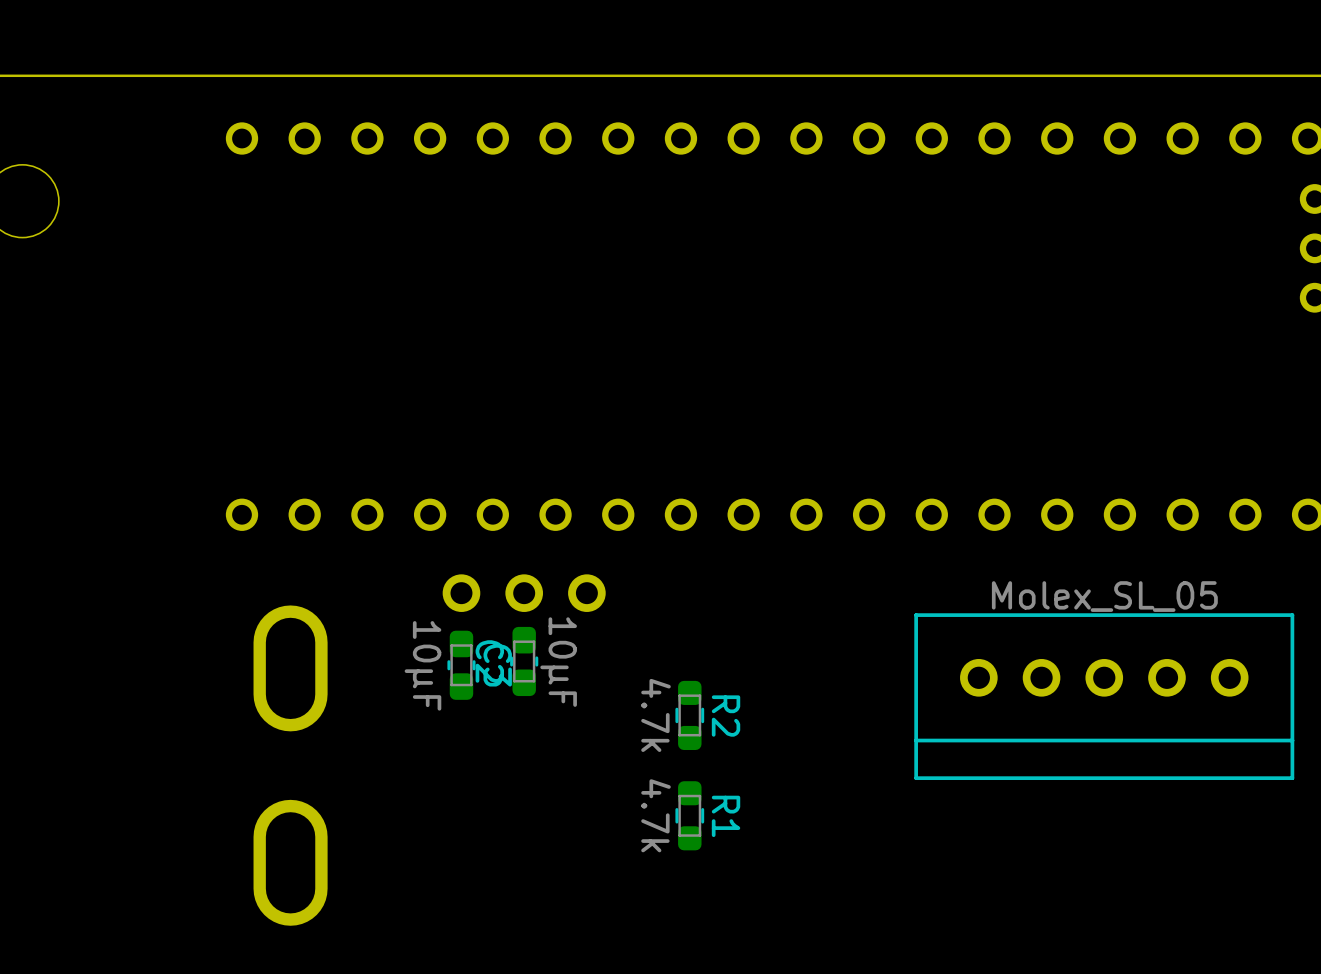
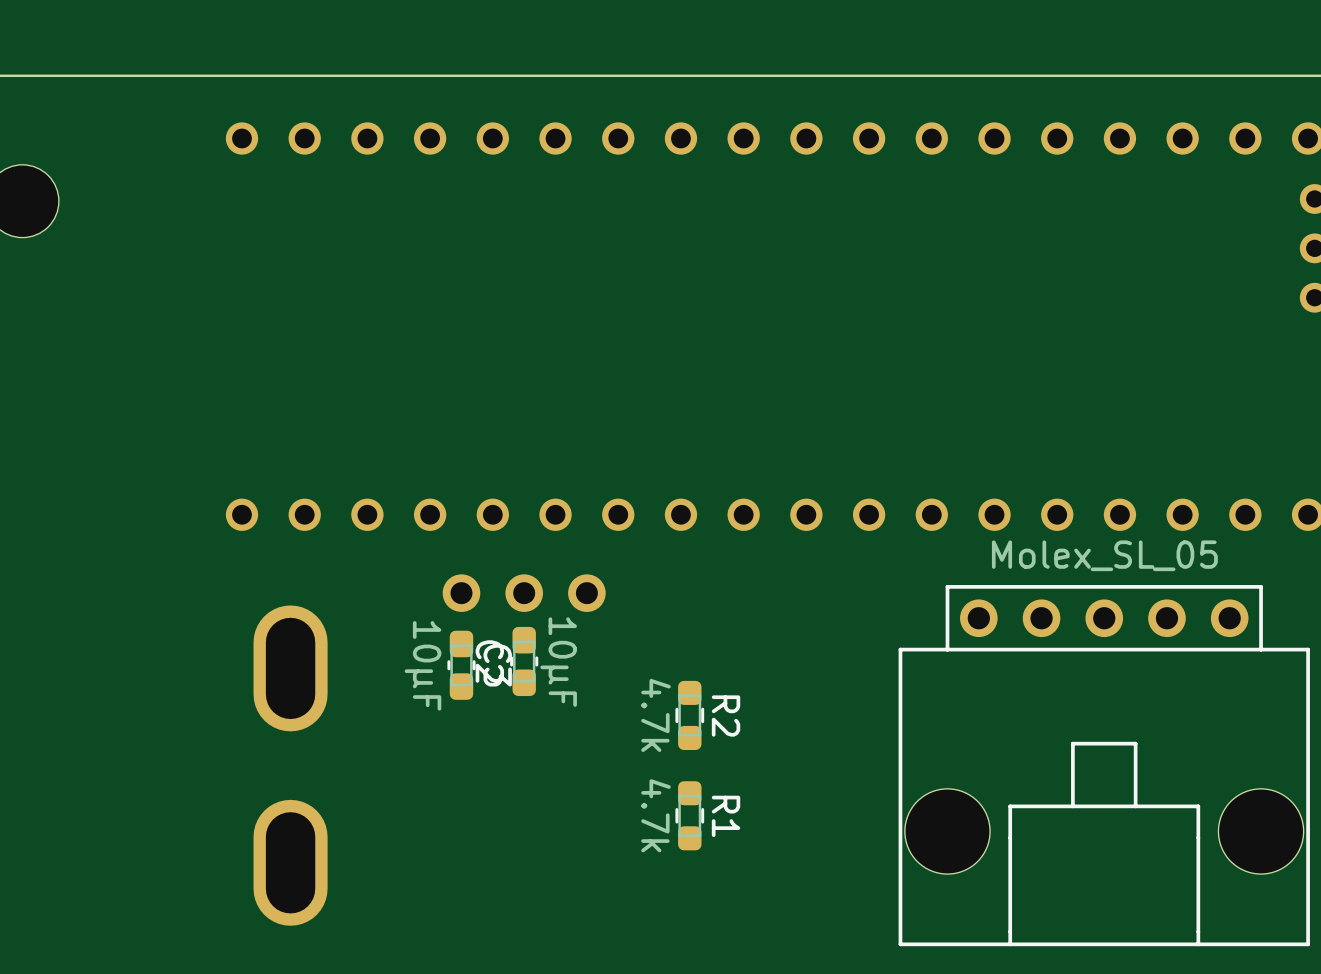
part: Molex_SL_05 (1104, 696) -> none
part: none -> Molex_SL_05 (1104, 765)

